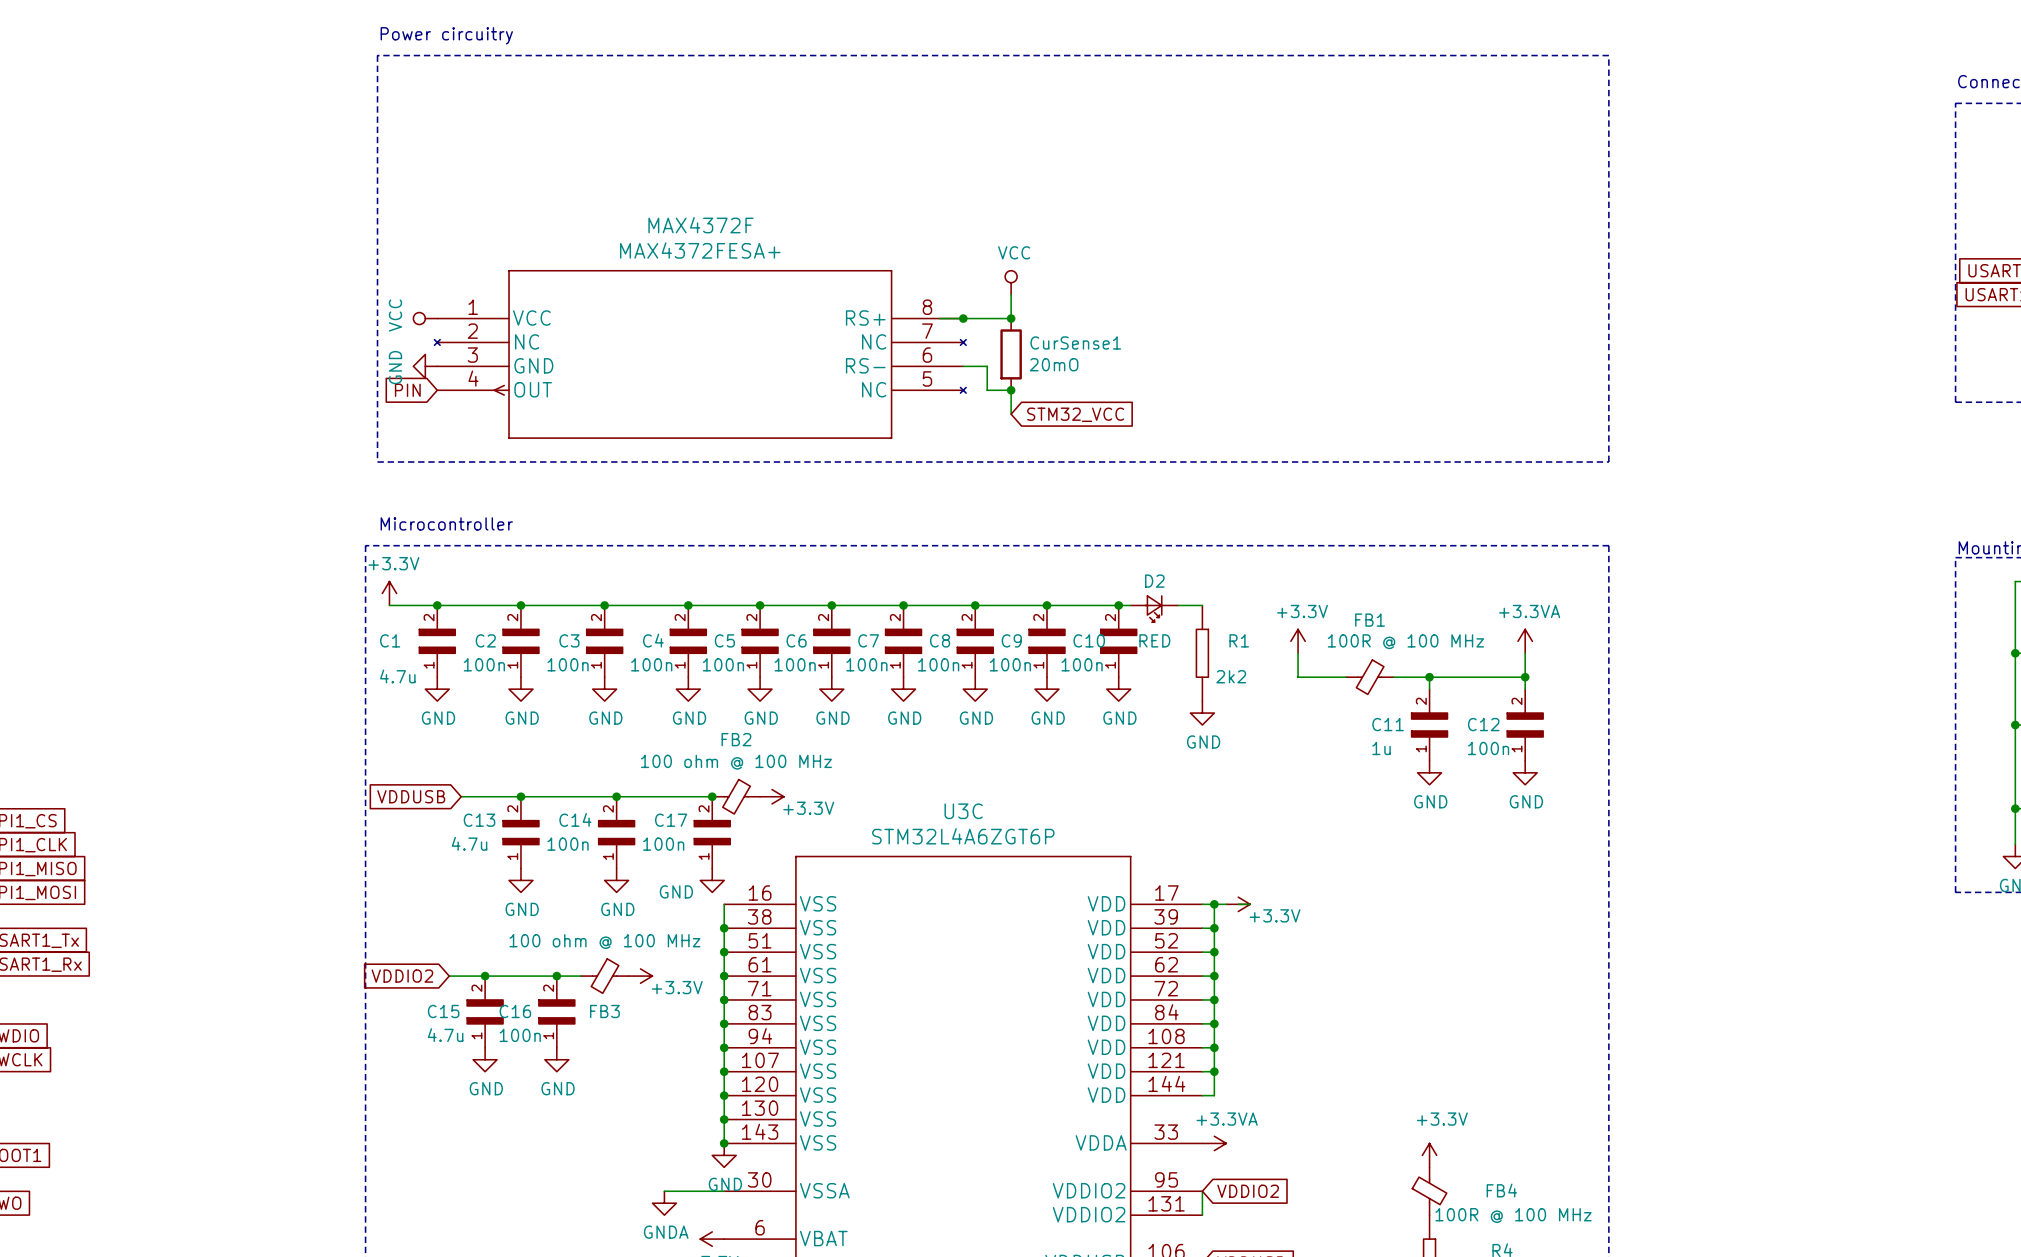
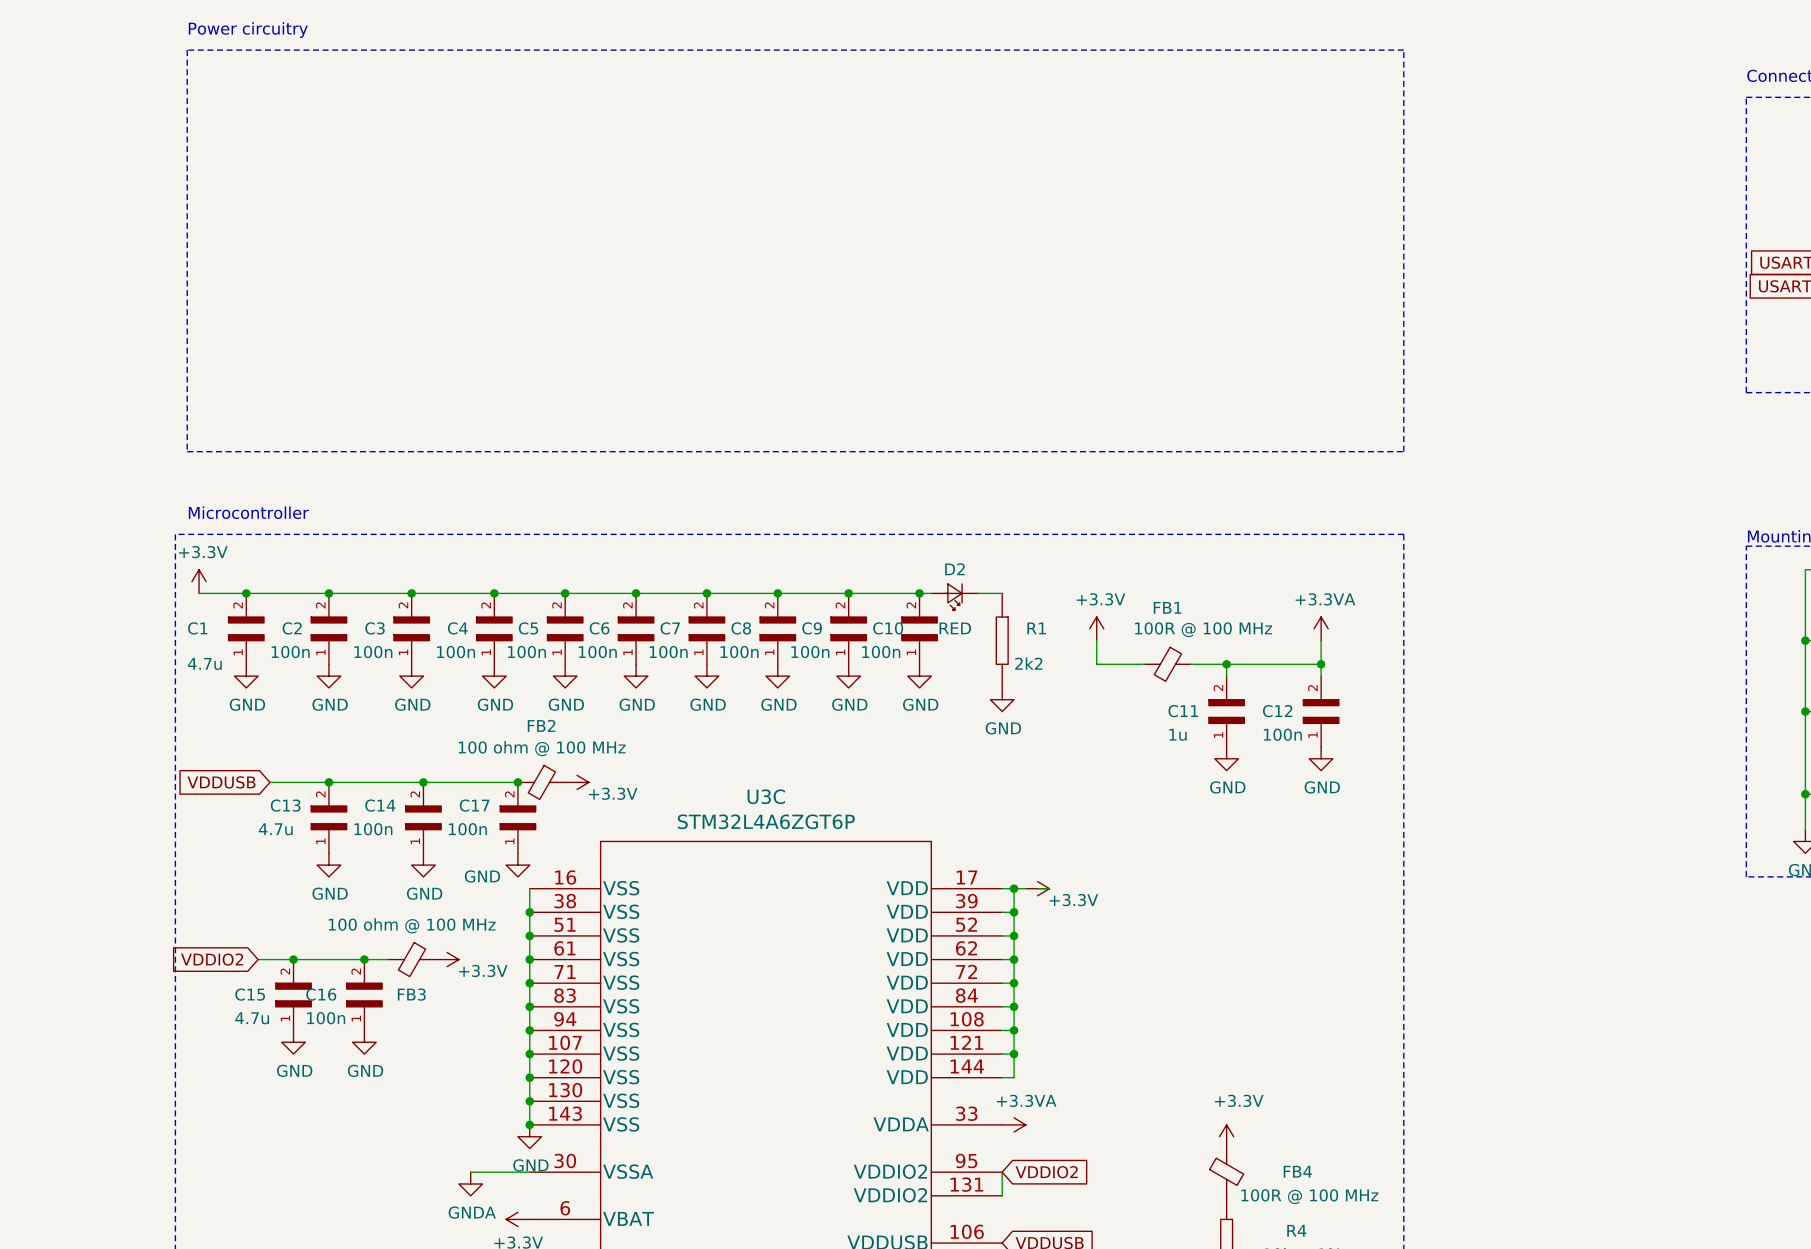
power symbol: VCC (1011, 282) -> none
wire: (1011, 294) (1011, 318) (939, 318) -> none
power symbol: VCC (425, 318) -> none
junction: (963, 318) -> none
junction: (1011, 318) -> none
MAX4372F: MAX4372FESA+ (700, 354) -> none
CurSense1: 20mO (1011, 354) -> none
power symbol: GND (425, 366) -> none
wire: (963, 366) (987, 366) (987, 390) (1011, 390) (1011, 414) -> none
global label: PIN (407, 390) -> none
junction: (1011, 390) -> none
global label: STM32_VCC (1075, 414) -> none

